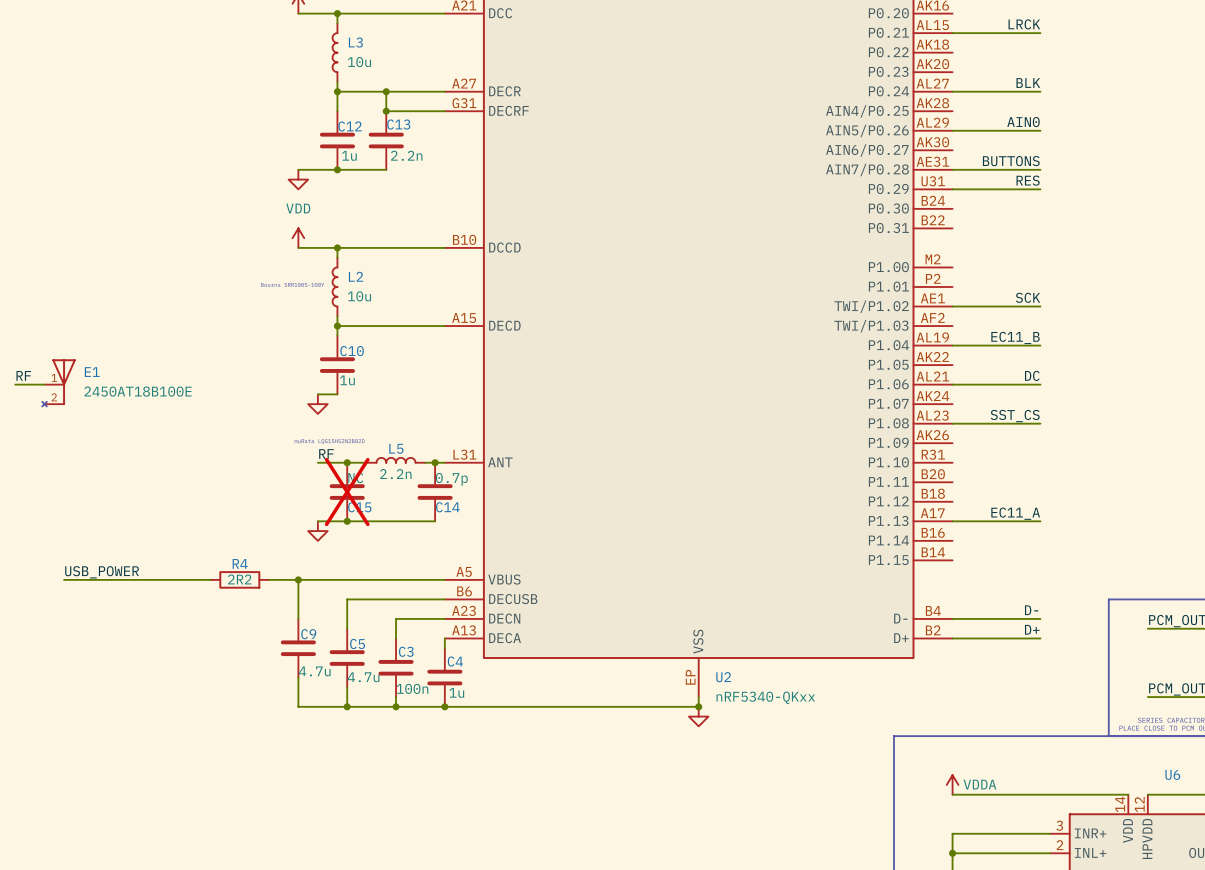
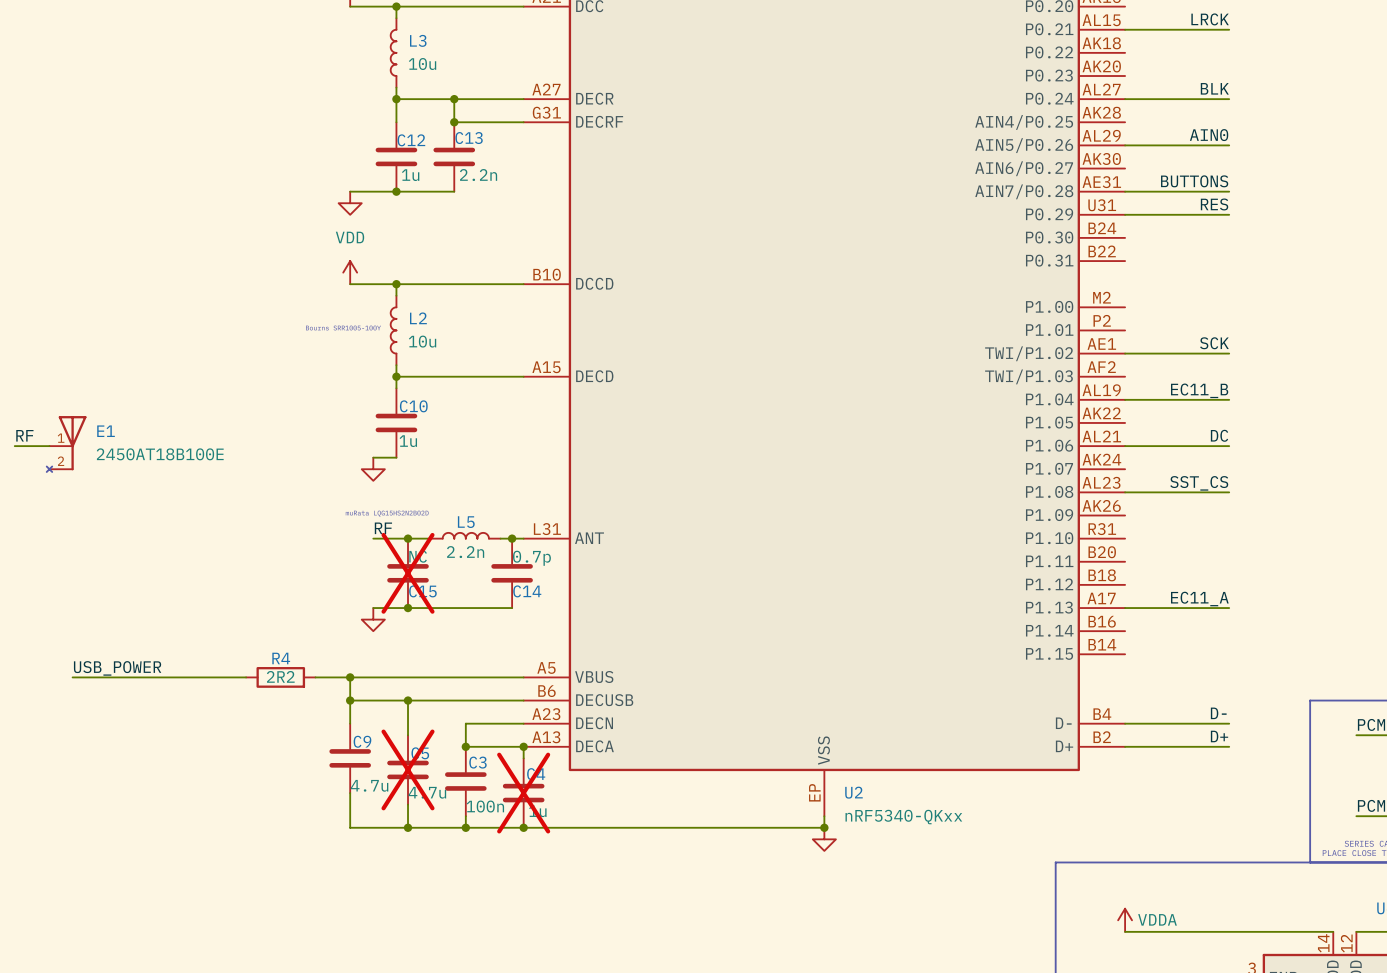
wire: none -> (350, 700) (408, 700)
junction: none -> (350, 700)
junction: none -> (408, 700)
wire: none -> (465, 746) (523, 746)
junction: none -> (465, 746)
junction: none -> (523, 746)
C5 do-not-place cross: none -> (408, 769)
C4 do-not-place cross: none -> (523, 793)

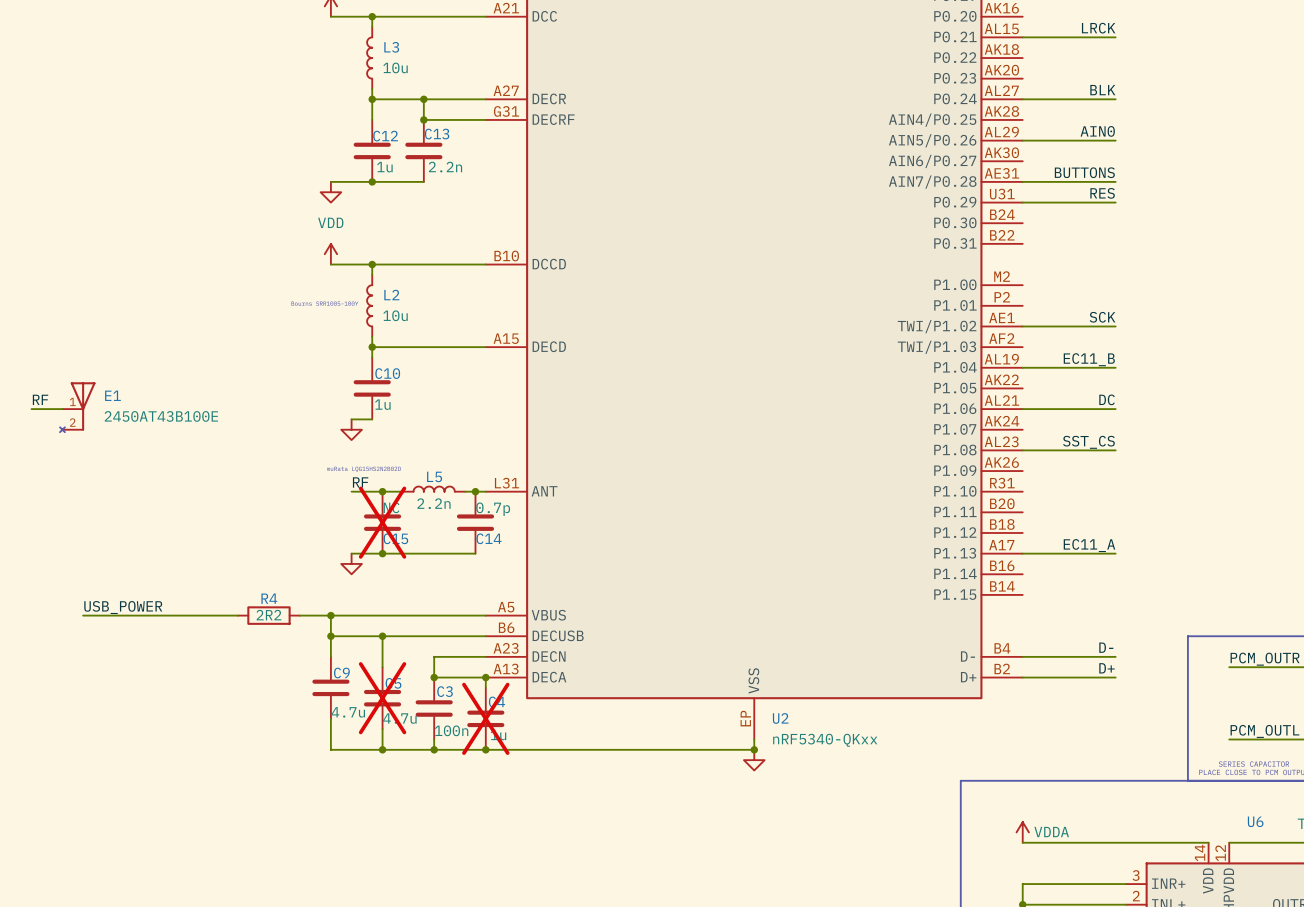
E1 value: 2450AT18B100E (160, 454) -> 2450AT43B100E (161, 416)

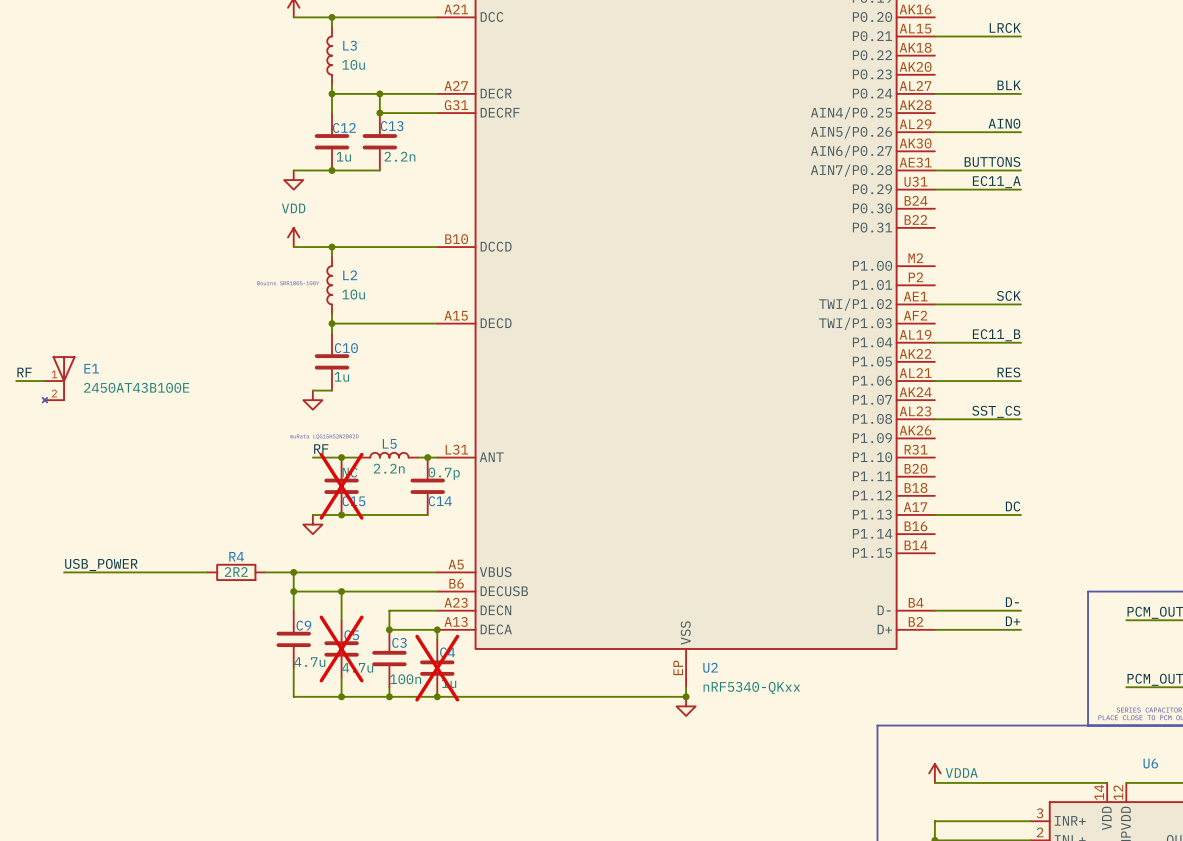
label: RES (1102, 193) -> EC11_A (996, 182)
label: DC (1107, 399) -> RES (1008, 372)
label: EC11_A (1089, 545) -> DC (1013, 506)

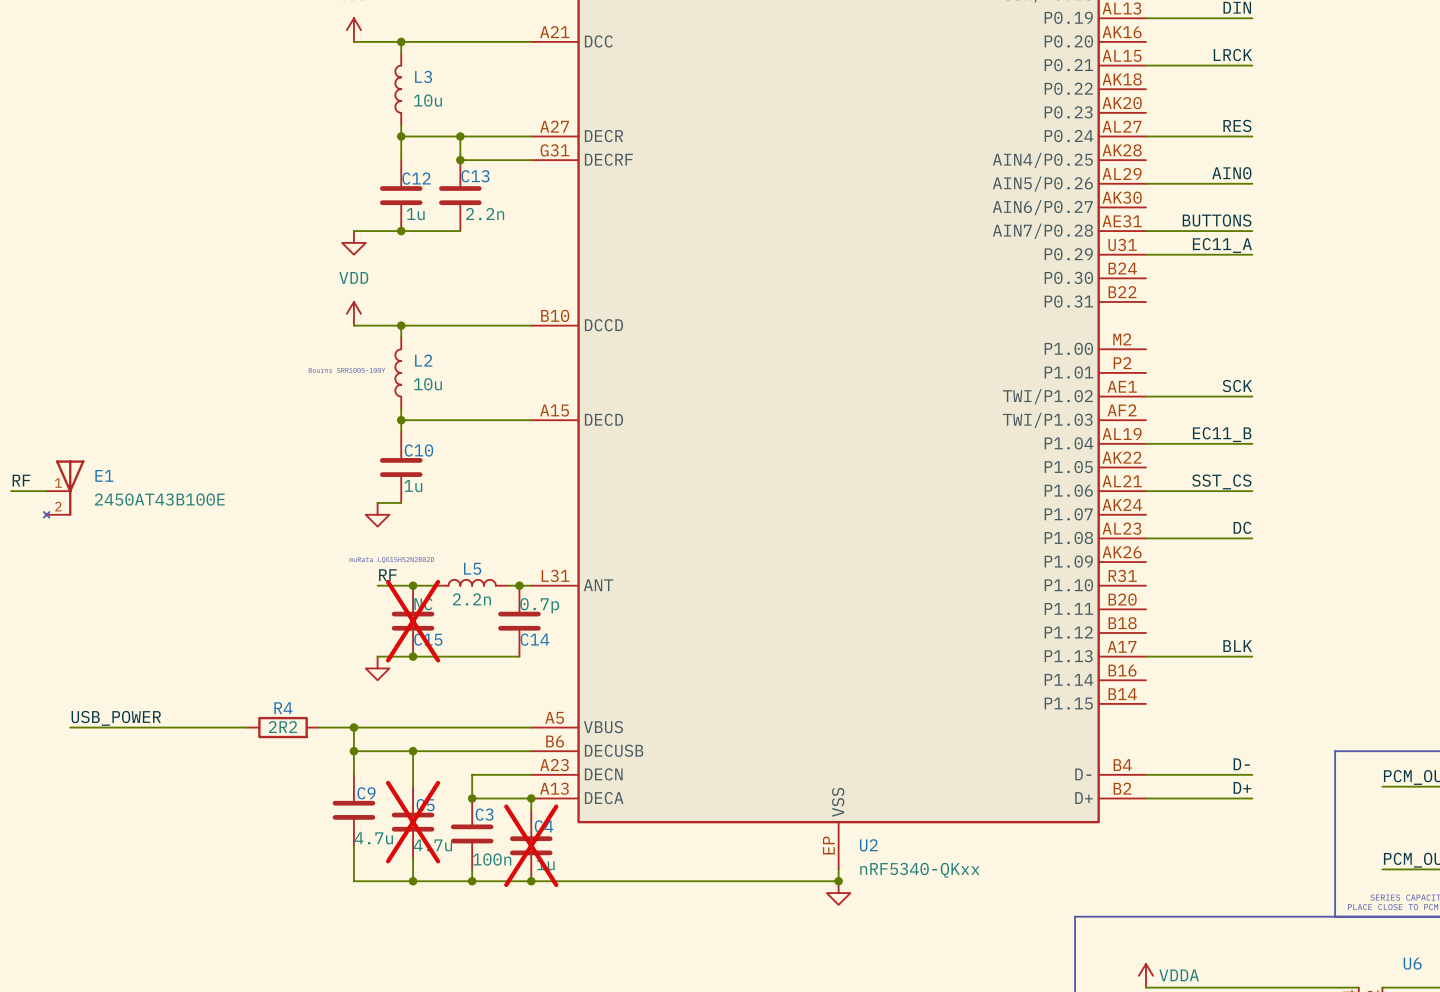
label: BLK (1009, 85) -> RES (1237, 125)
label: RES (1008, 372) -> SST_CS (1221, 481)
label: SST_CS (996, 411) -> DC (1242, 527)
label: DC (1013, 506) -> BLK (1237, 646)

